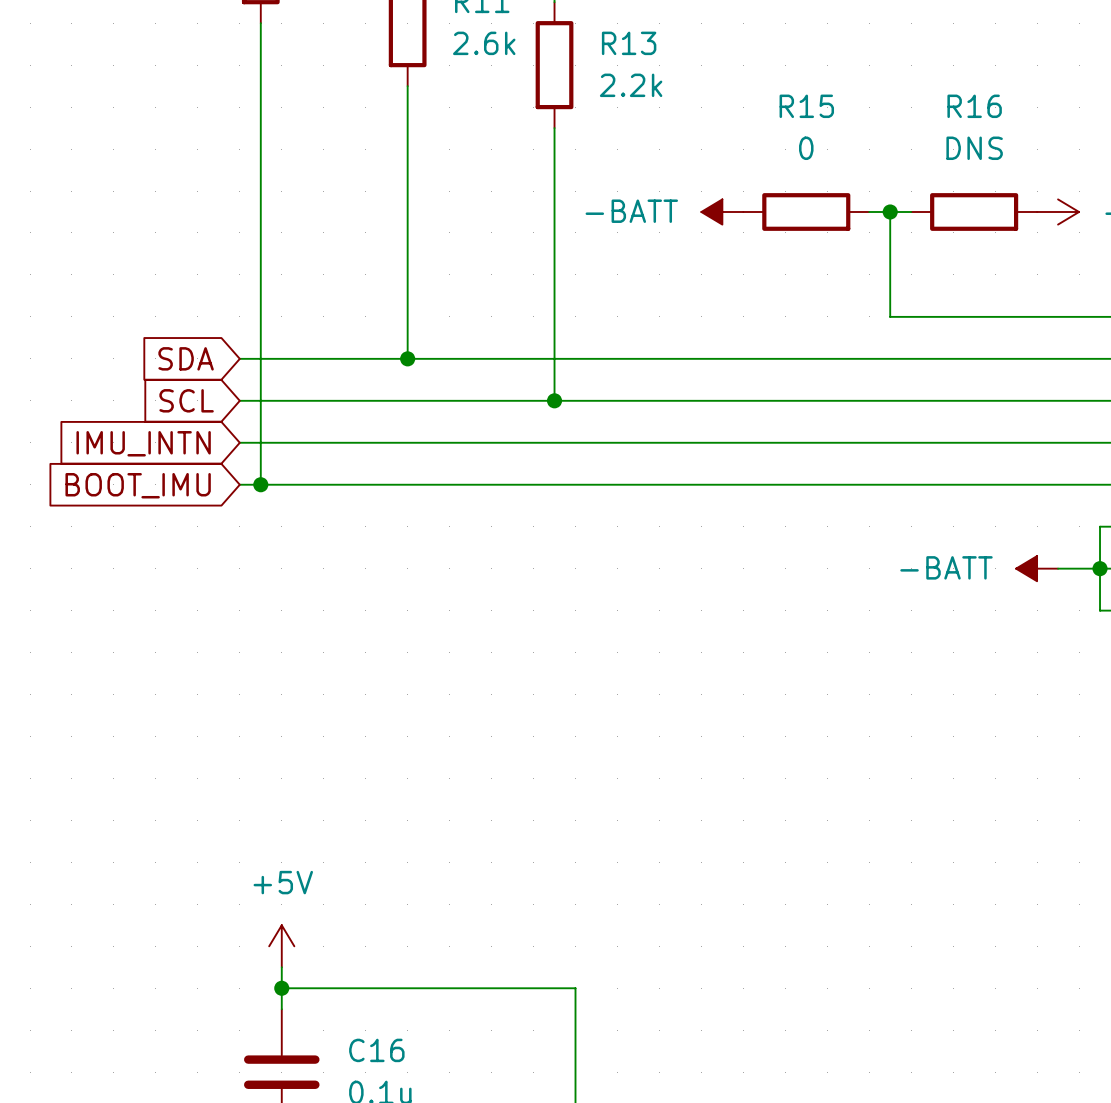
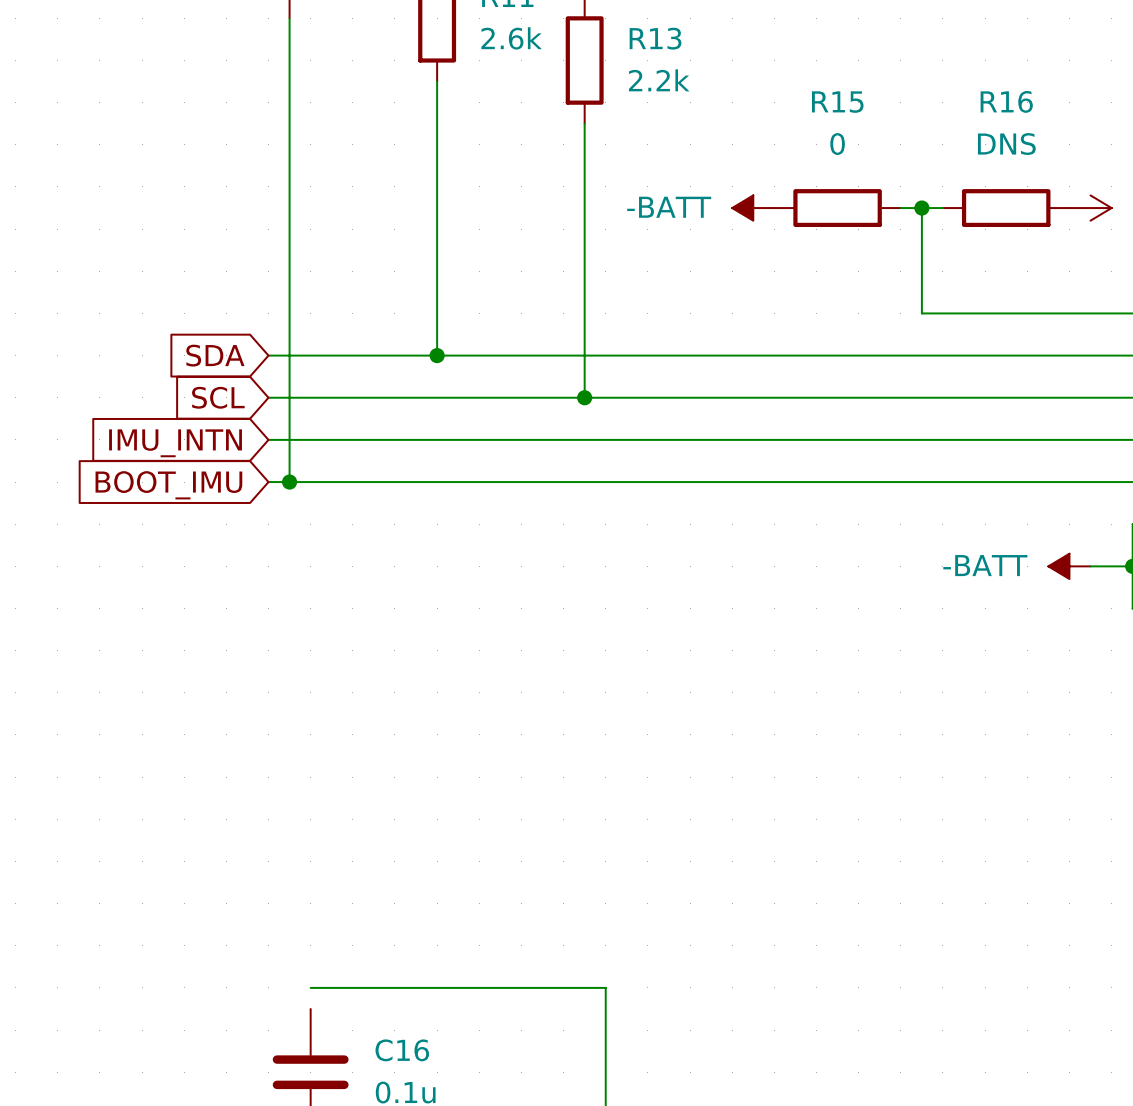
power symbol: +5V (281, 946) -> none
wire: (281, 967) (281, 1009) -> none
junction: (281, 988) -> none

